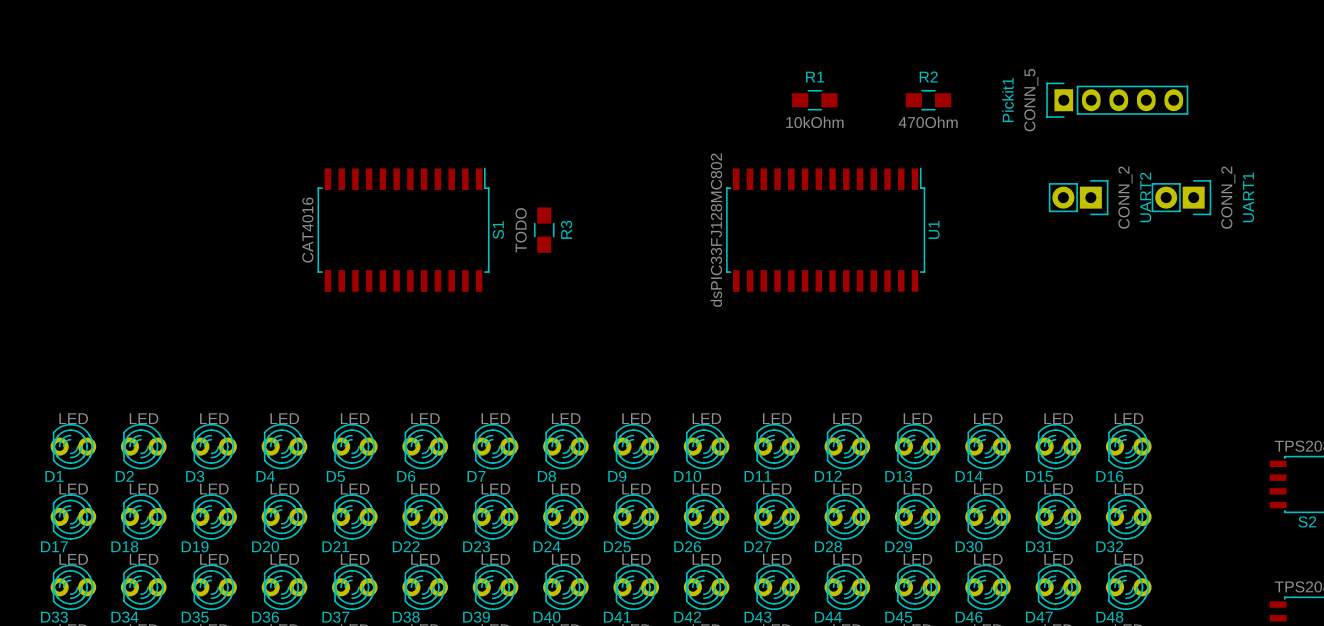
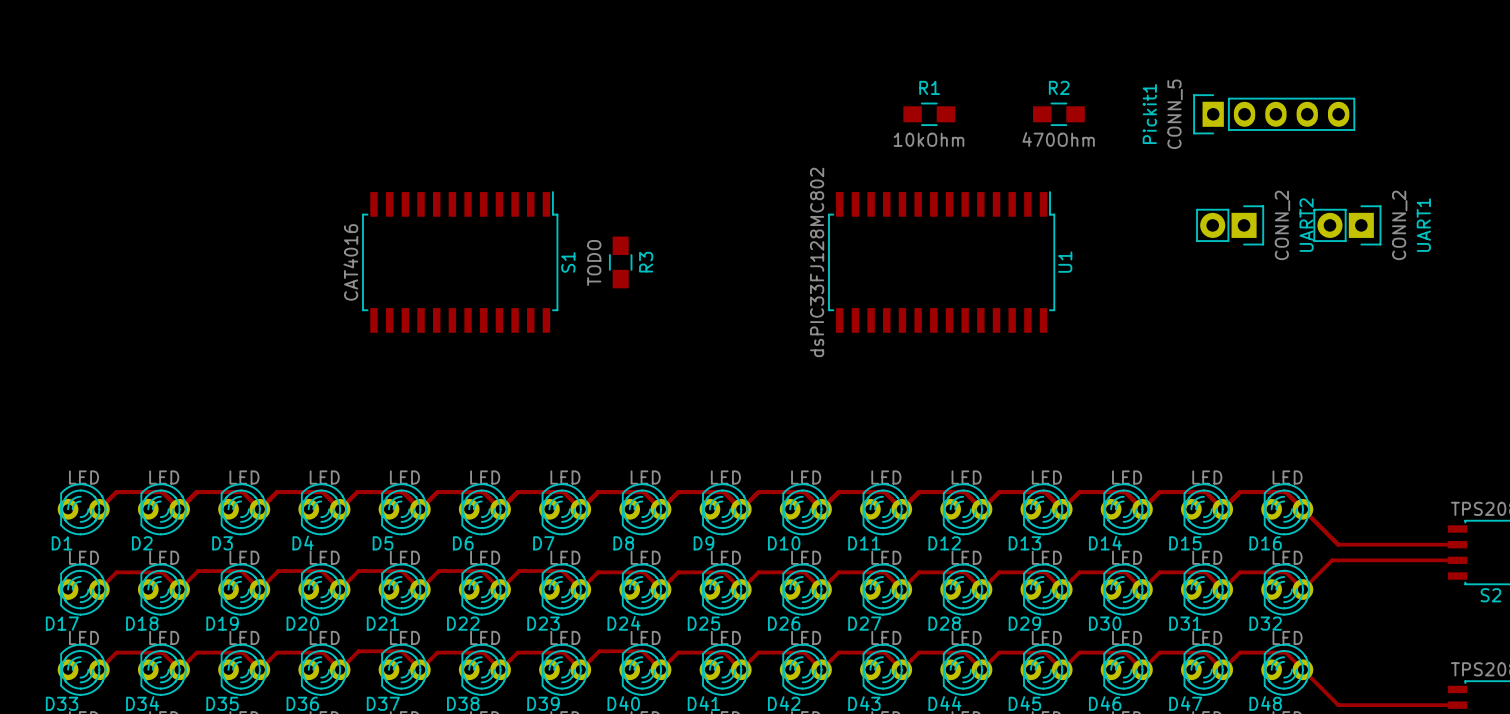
track: none -> (99, 509) (116, 492) (162, 492) (179, 509) (196, 492) (242, 492) (259, 509) (277, 492) (322, 492) (340, 509) (357, 492) (403, 492) (420, 509) (437, 492) (483, 492) (500, 509) (517, 492) (563, 492) (580, 509) (597, 492) (643, 492) (661, 509) (678, 492) (724, 492) (741, 509) (758, 492) (804, 492) (821, 509) (838, 492) (884, 492) (901, 509) (918, 492) (964, 492) (981, 509) (999, 492) (1045, 492) (1062, 509) (1079, 492) (1125, 492) (1142, 509) (1159, 492) (1205, 492) (1222, 509) (1239, 492) (1285, 492) (1338, 544) (1457, 544)
track: none -> (1457, 560) (1332, 560) (1302, 589) (1285, 572) (1239, 572) (1222, 589) (1205, 572) (1159, 572) (1142, 589) (1125, 572) (1079, 572) (1062, 589) (1045, 572) (999, 572) (981, 589) (964, 572) (918, 572) (901, 589) (884, 572) (838, 572) (821, 589) (804, 572) (758, 572) (741, 589) (724, 572) (678, 572) (661, 589) (643, 572) (597, 572) (580, 589) (562, 571) (519, 571) (500, 589) (482, 571) (438, 571) (420, 589) (401, 571) (358, 571) (340, 589) (321, 571) (278, 571) (259, 589) (241, 571) (198, 571) (179, 589) (162, 572) (116, 572) (99, 589)
track: none -> (99, 669) (116, 652) (162, 652) (179, 669) (196, 652) (242, 652) (259, 669) (277, 652) (322, 652) (340, 669) (358, 651) (401, 651) (420, 669) (437, 652) (483, 652) (500, 669) (517, 652) (563, 652) (580, 669) (599, 651) (642, 651) (661, 669) (678, 652) (724, 652) (741, 669) (758, 652) (804, 652) (821, 669) (838, 652) (884, 652) (901, 669) (918, 652) (964, 652) (981, 669) (999, 652) (1045, 652) (1062, 669) (1079, 652) (1125, 652) (1142, 669) (1159, 652) (1205, 652) (1222, 669) (1239, 652) (1285, 652) (1338, 705) (1457, 705)

